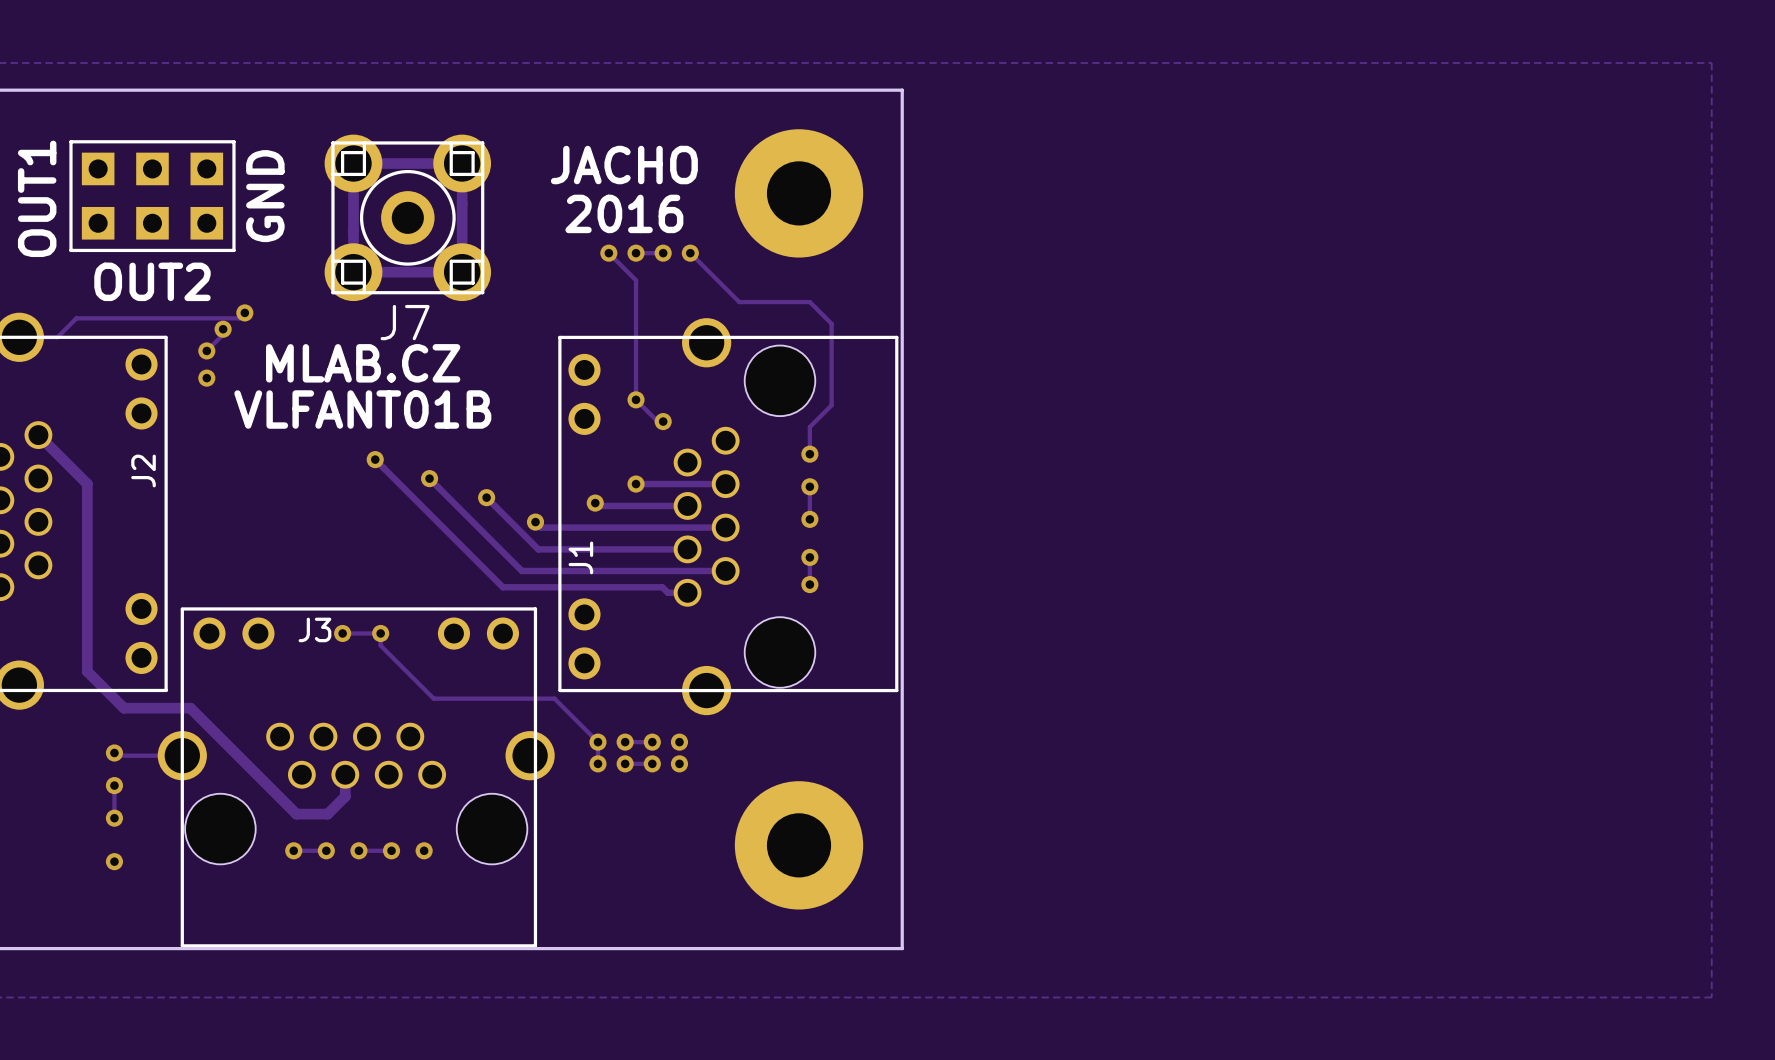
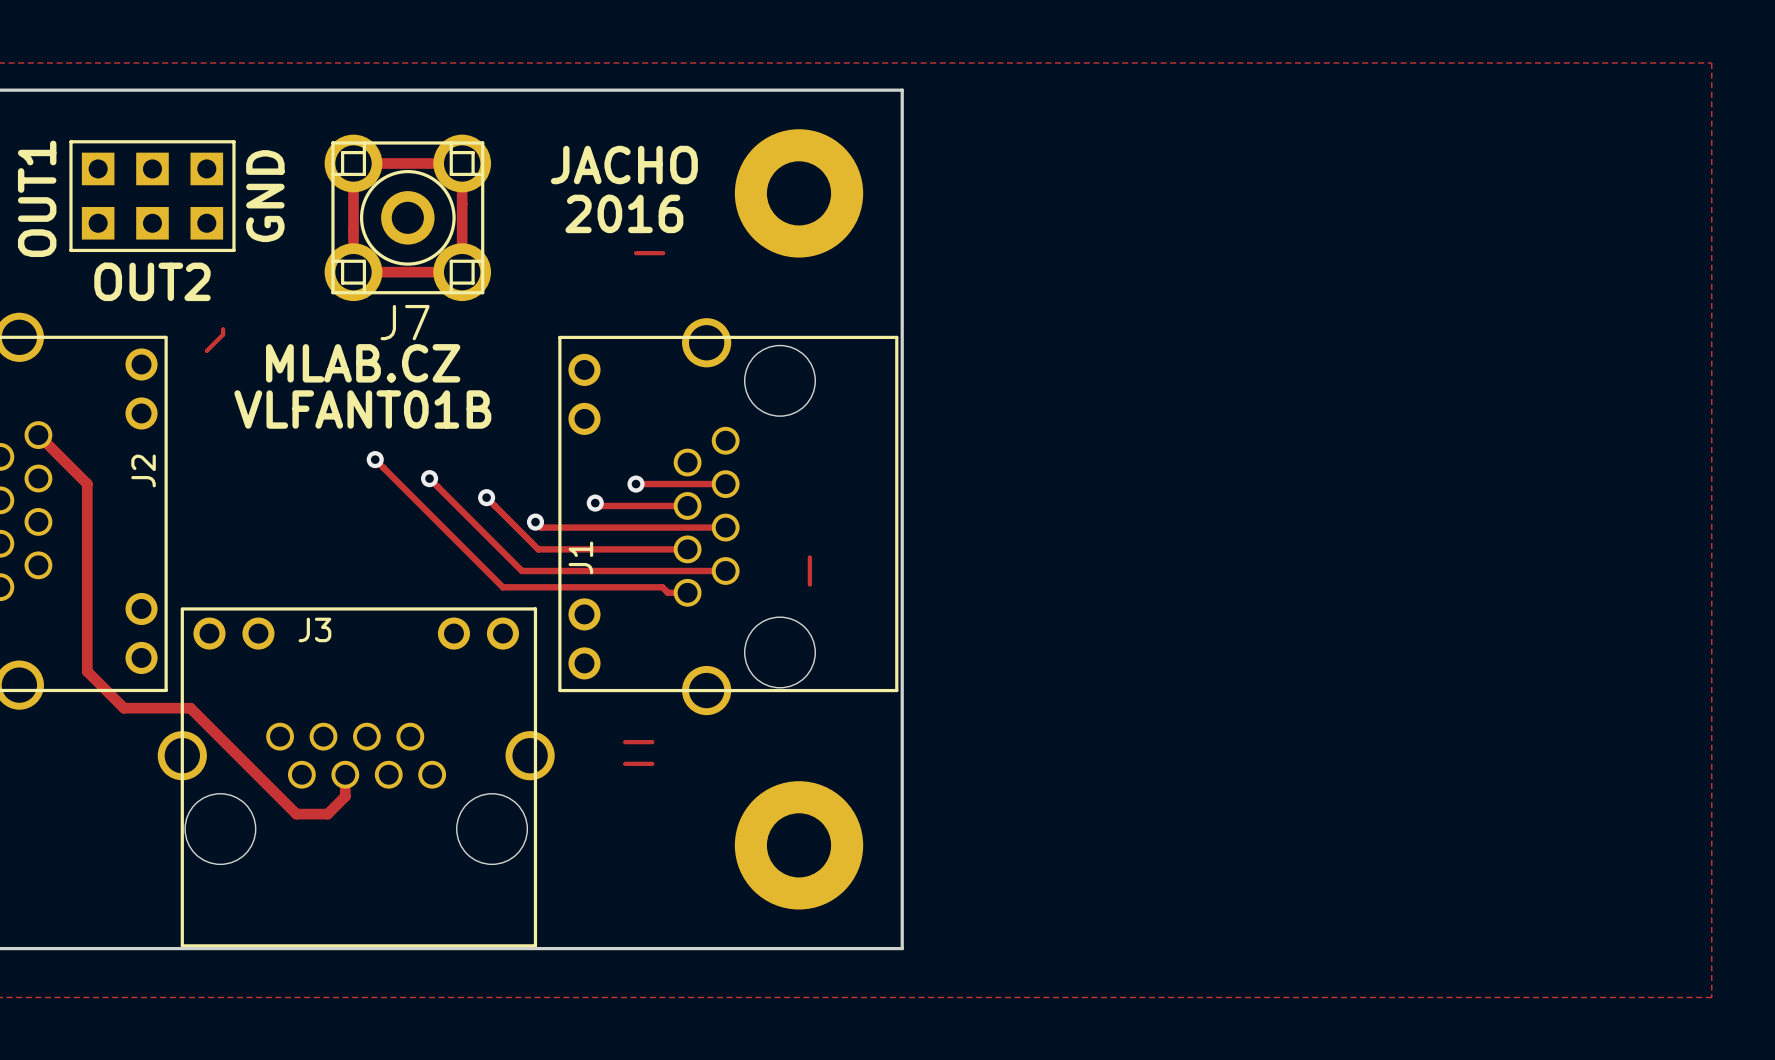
track: (608, 253) (636, 280) (636, 399) (657, 421) (663, 421) -> none
via: (608, 253) -> none
via: (636, 253) -> none
via: (663, 253) -> none
track: (690, 253) (739, 302) (809, 302) (831, 323) (831, 405) (809, 427) (809, 454) -> none
via: (690, 253) -> none
track: (244, 312) (239, 318) (76, 318) (57, 337) (19, 337) -> none
via: (244, 312) -> none
via: (223, 329) -> none
via: (206, 350) -> none
via: (206, 378) -> none
via: (636, 399) -> none
via: (663, 421) -> none
via: (809, 454) -> none
track: (809, 486) (809, 519) -> none
via: (809, 486) -> none
via: (809, 519) -> none
via: (809, 557) -> none
via: (809, 584) -> none
track: (342, 633) (380, 633) (380, 645) (433, 698) (554, 698) (597, 742) (597, 763) -> none
via: (342, 633) -> none
via: (380, 633) -> none
via: (597, 742) -> none
via: (625, 742) -> none
via: (652, 742) -> none
via: (679, 742) -> none
track: (114, 752) (117, 755) (182, 755) -> none
via: (114, 752) -> none
via: (597, 763) -> none
via: (625, 763) -> none
via: (652, 763) -> none
via: (679, 763) -> none
track: (114, 785) (114, 818) -> none
via: (114, 785) -> none
via: (114, 818) -> none
track: (293, 850) (326, 850) -> none
via: (293, 850) -> none
via: (326, 850) -> none
track: (358, 850) (391, 850) -> none
via: (358, 850) -> none
via: (391, 850) -> none
via: (424, 850) -> none
via: (114, 861) -> none

